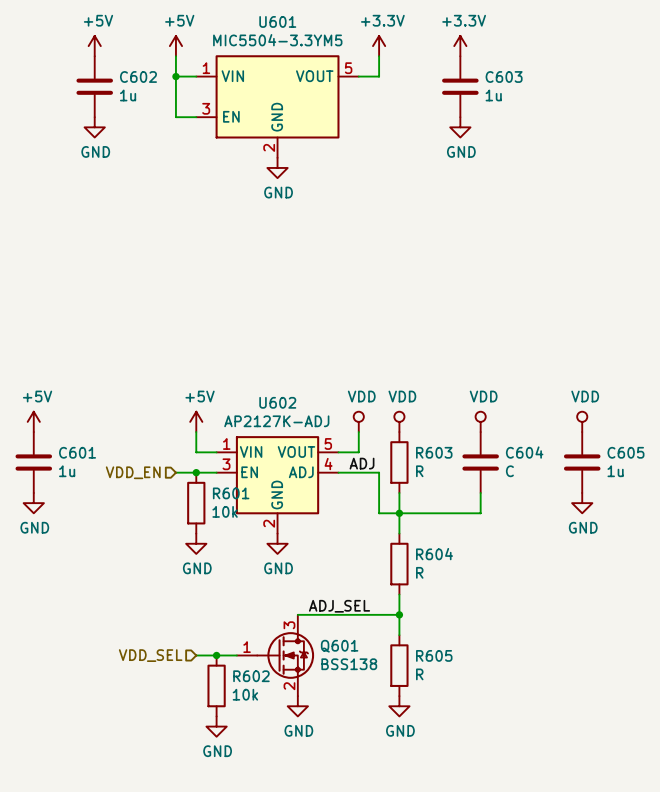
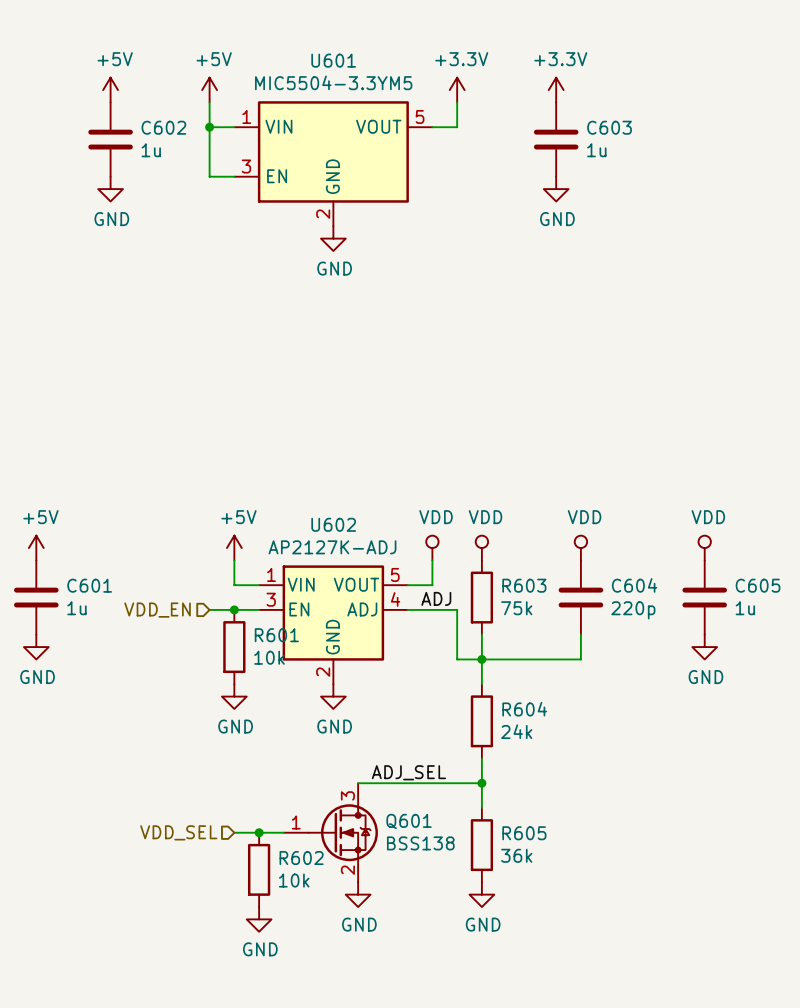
R603 value: R (419, 471) -> 75k (516, 608)
C604 value: C (509, 471) -> 220p (633, 610)
R604 value: R (419, 572) -> 24k (516, 731)
R605 value: R (419, 674) -> 36k (516, 855)

